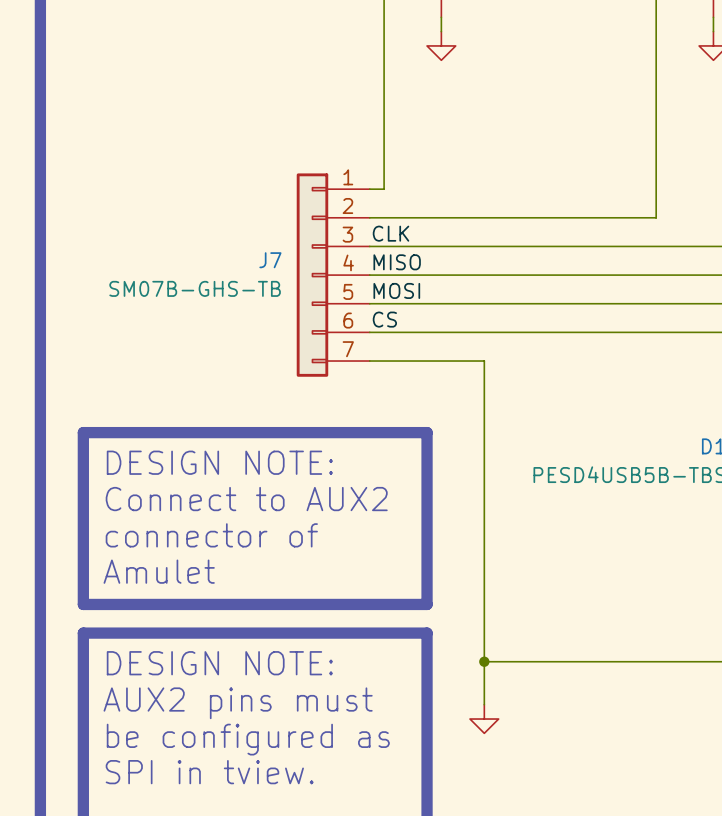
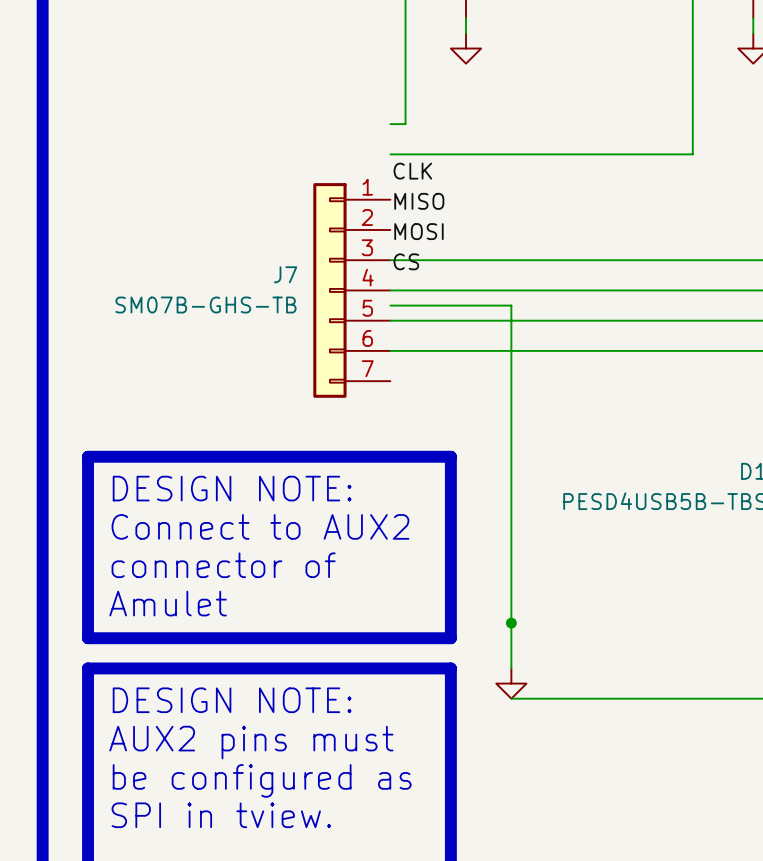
wire: (384, 117) (384, 189) (369, 189) -> (405, 124) (390, 124)
wire: (656, 146) (656, 217) (369, 217) -> (692, 154) (390, 154)
label position: CLK (391, 233) -> CLK (412, 171)
label position: MISO (397, 262) -> MISO (419, 201)
label position: MOSI (396, 290) -> MOSI (418, 231)
label position: CS (384, 319) -> CS (406, 261)
wire: (369, 361) (484, 361) -> (390, 305) (511, 305) (511, 381)
junction: none -> (511, 623)
wire: (484, 633) (484, 704) -> none
junction: (484, 661) -> none
power symbol position: (484, 719) -> (511, 683)

